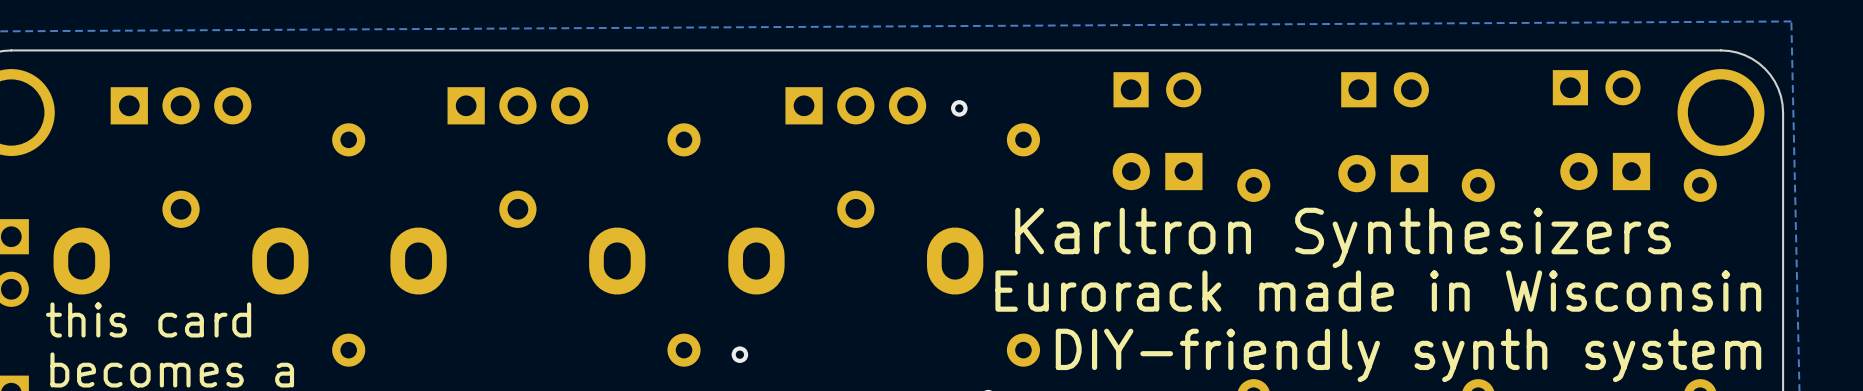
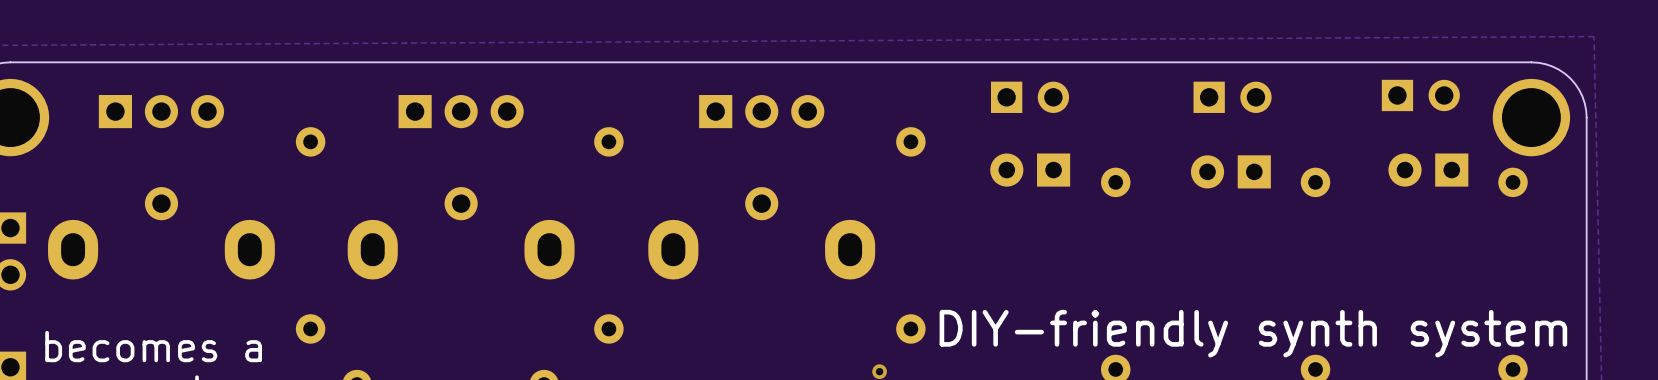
via: (959, 108) -> none
text: Karltron Synthesizers (1343, 237) -> none
text: Eurorack made in Wisconsin (1378, 291) -> none
text: this card (148, 319) -> none
via: (739, 354) -> none

